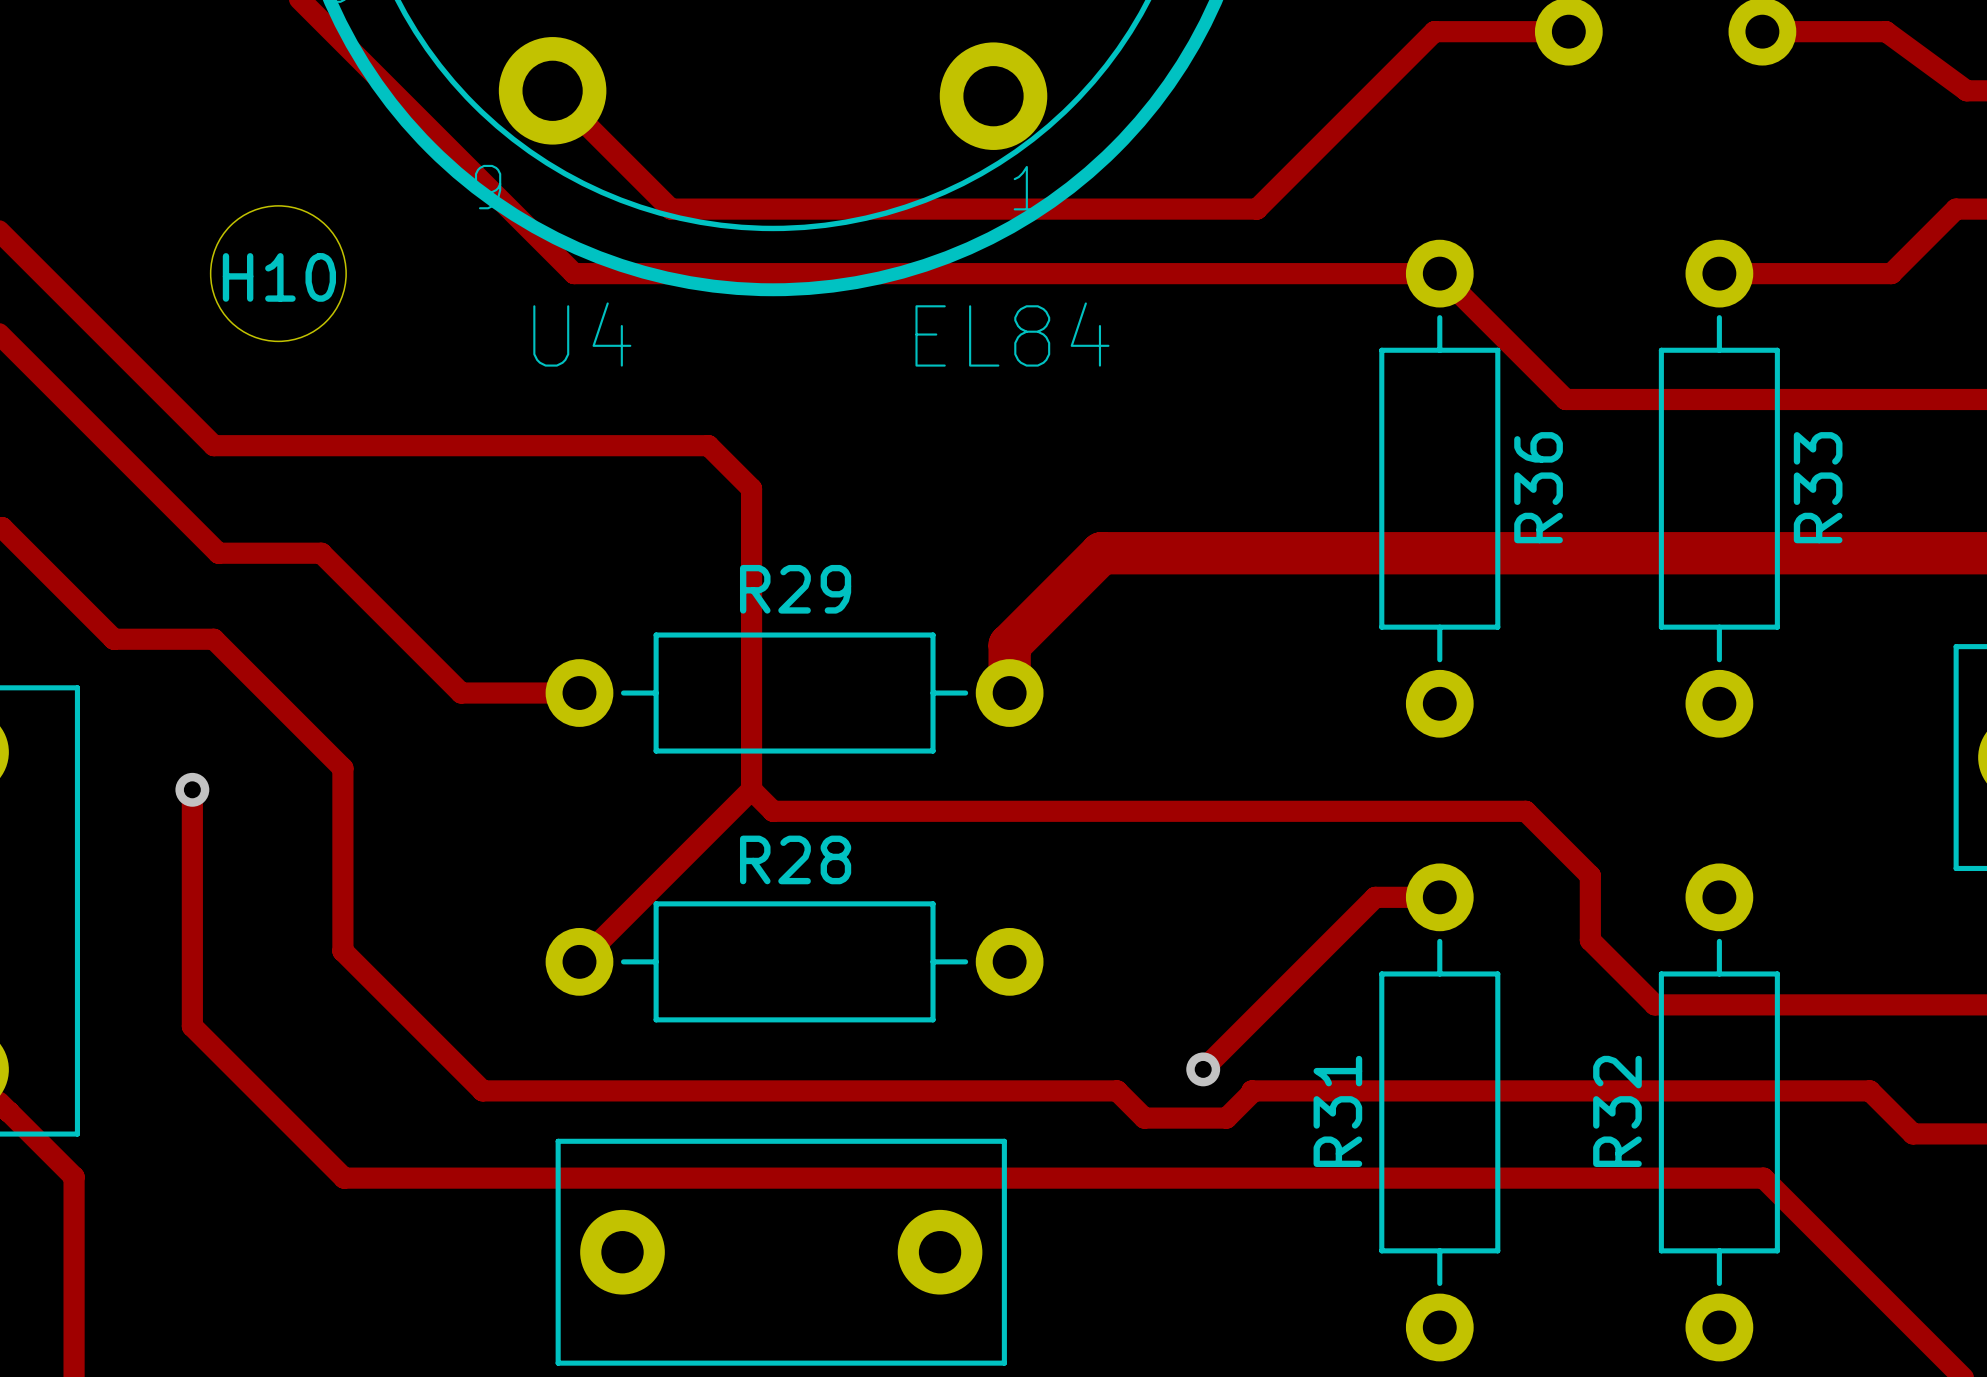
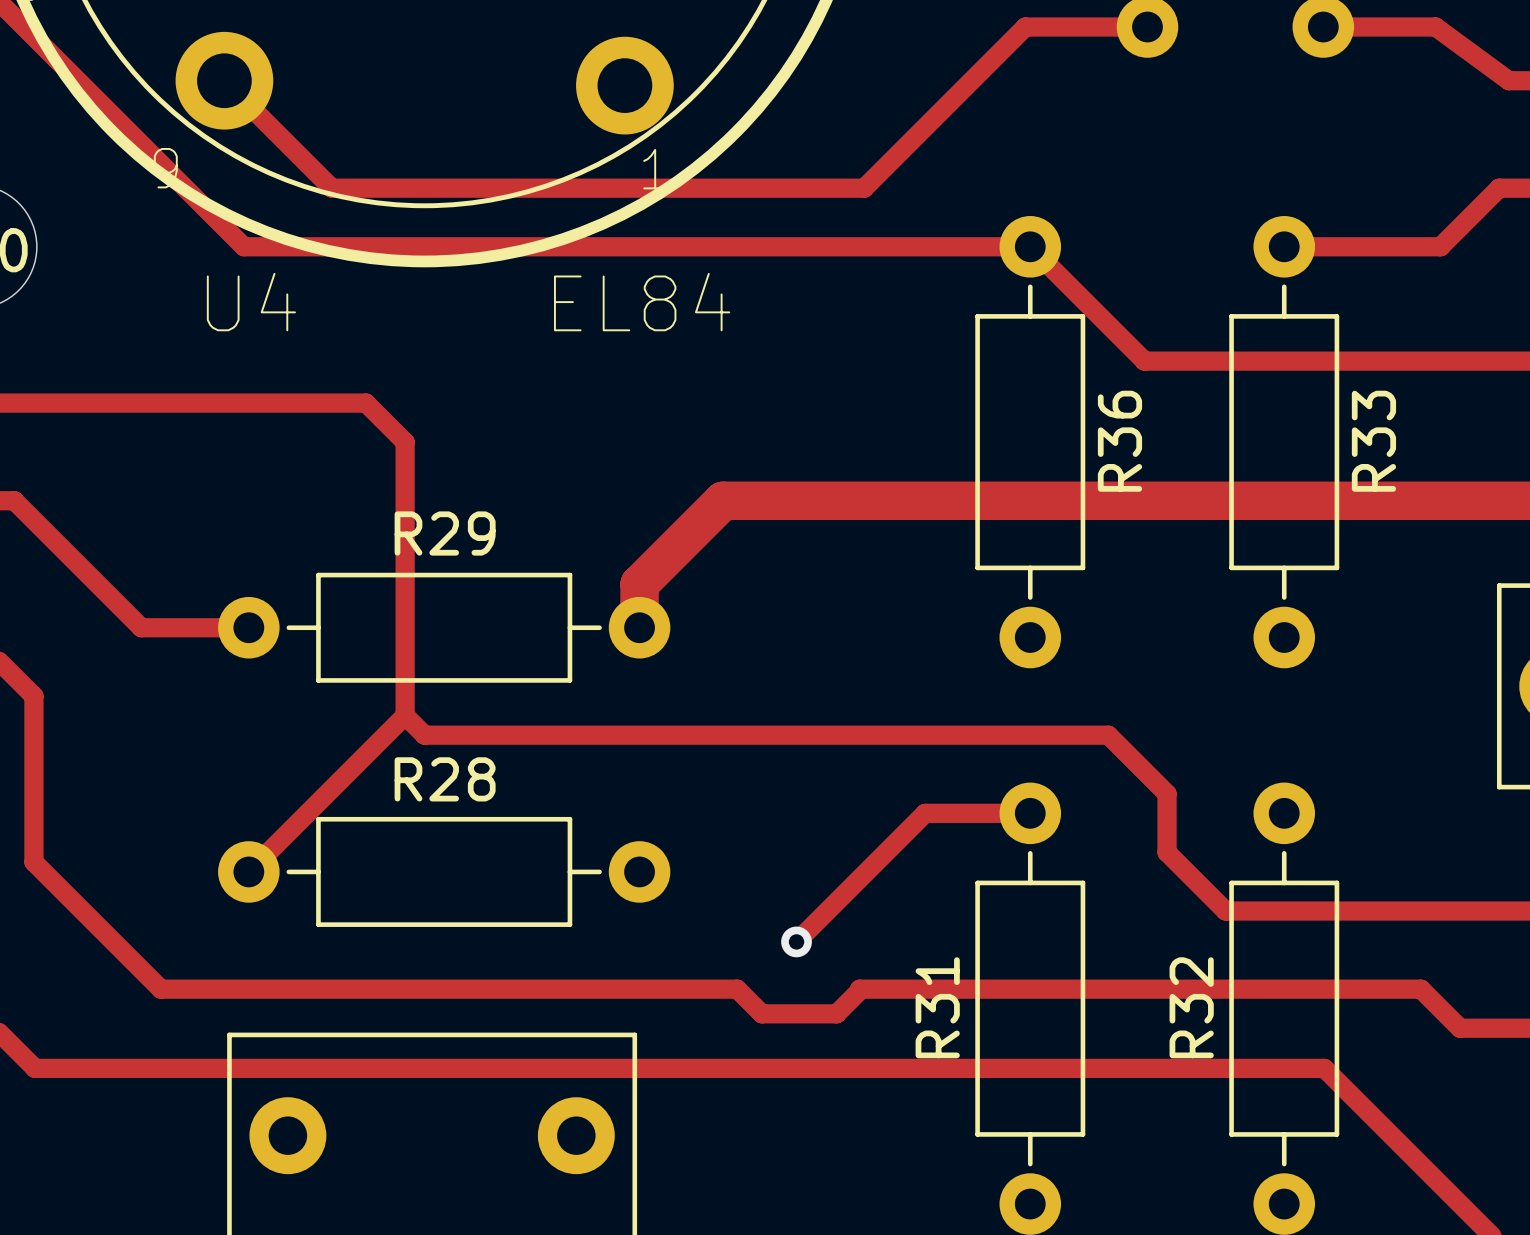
track: (1375, 897) (1203, 1069) -> (971, 813) (925, 813) (796, 941)
via position: (1203, 1069) -> (796, 941)

